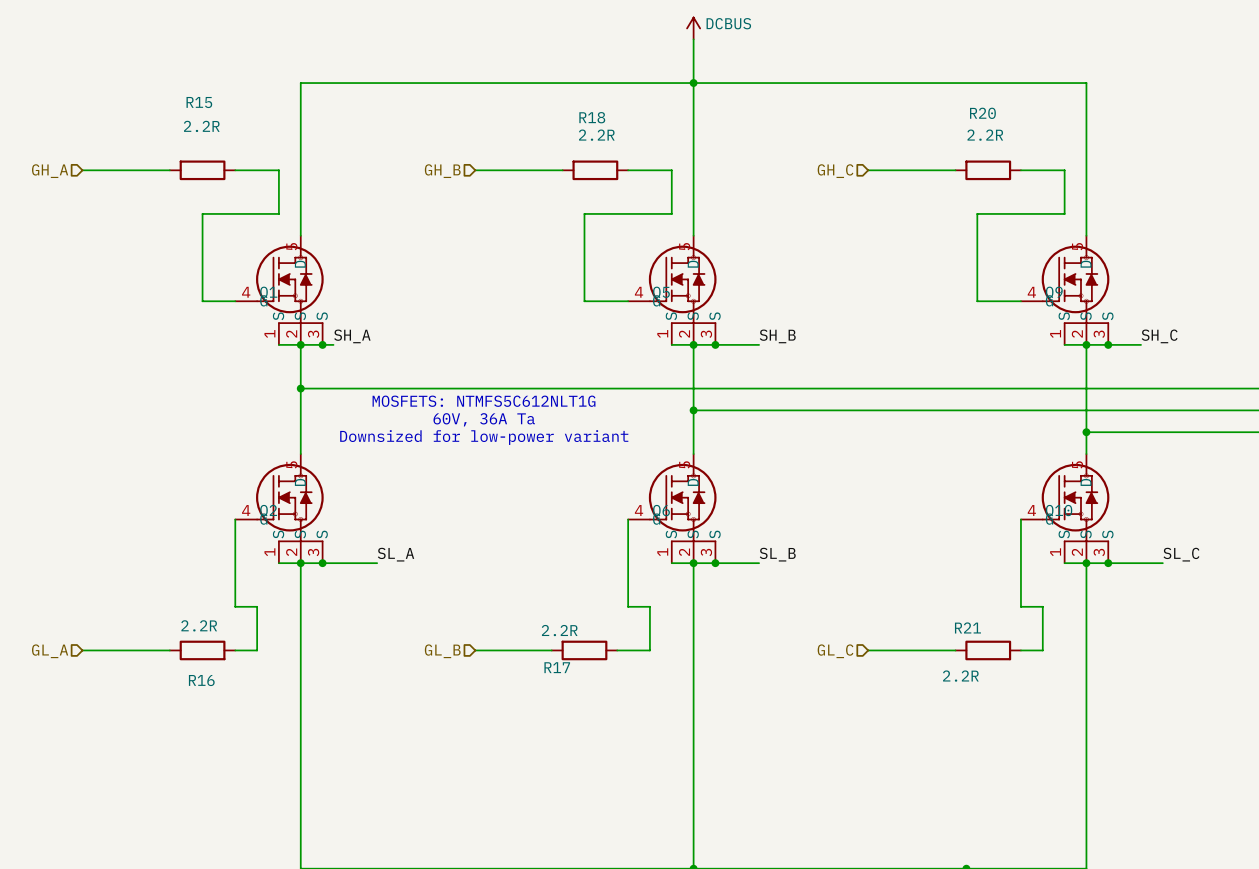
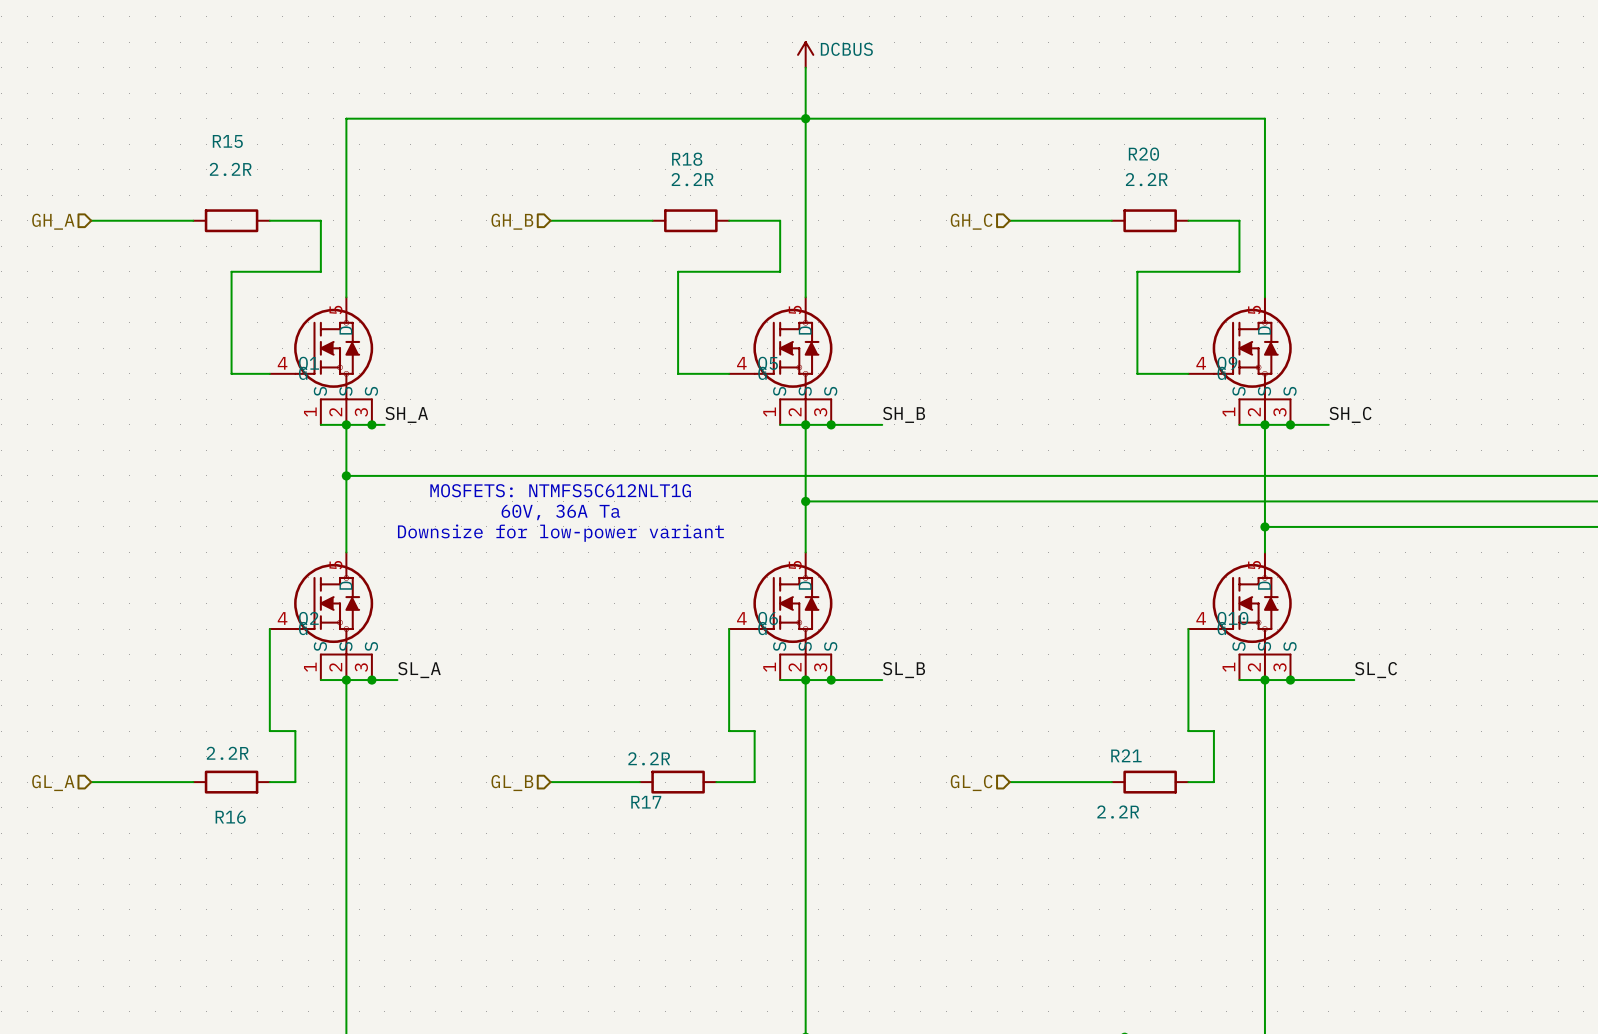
text: Downsized for low-power variant (484, 437) -> Downsize for low-power variant (560, 533)
label position: SL_A (396, 554) -> SL_A (419, 670)
wire: (344, 563) (377, 563) -> none

